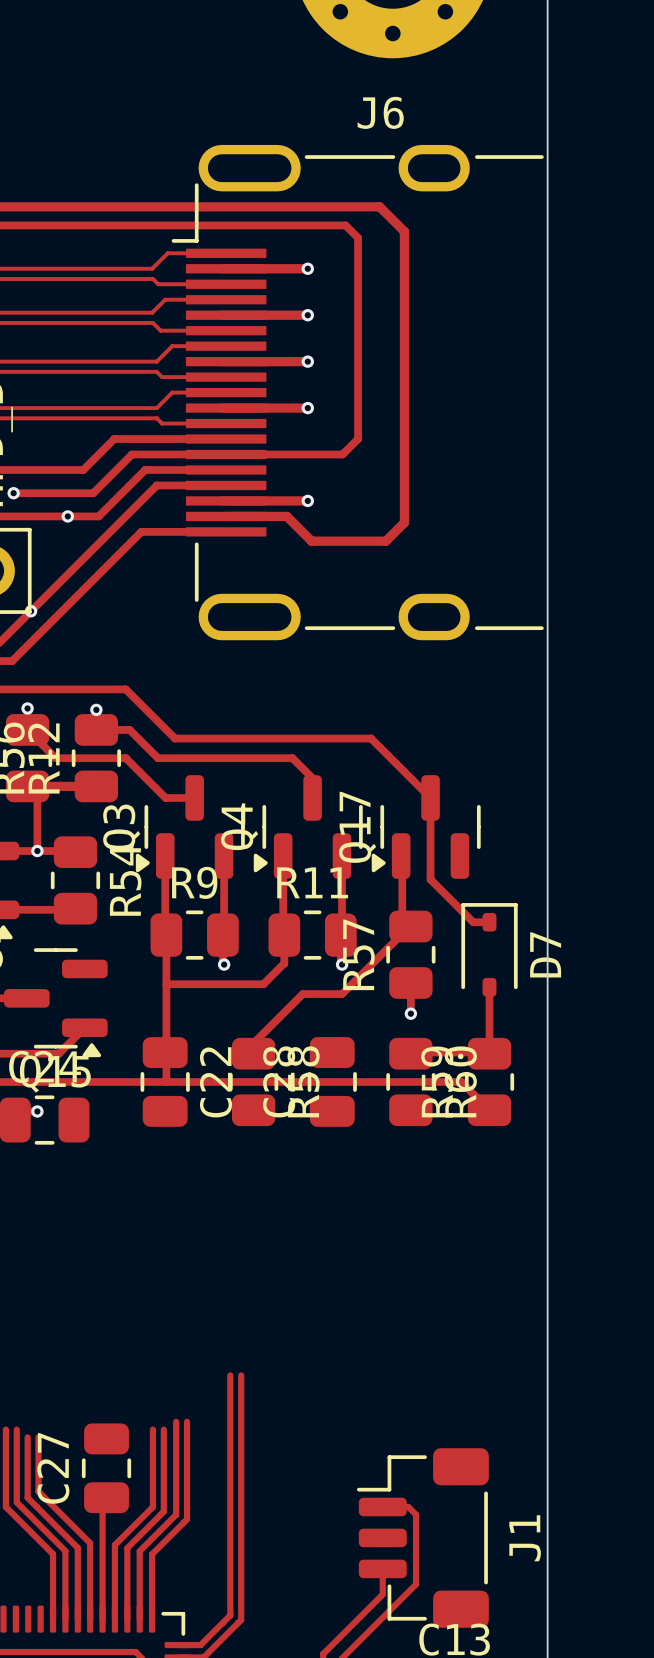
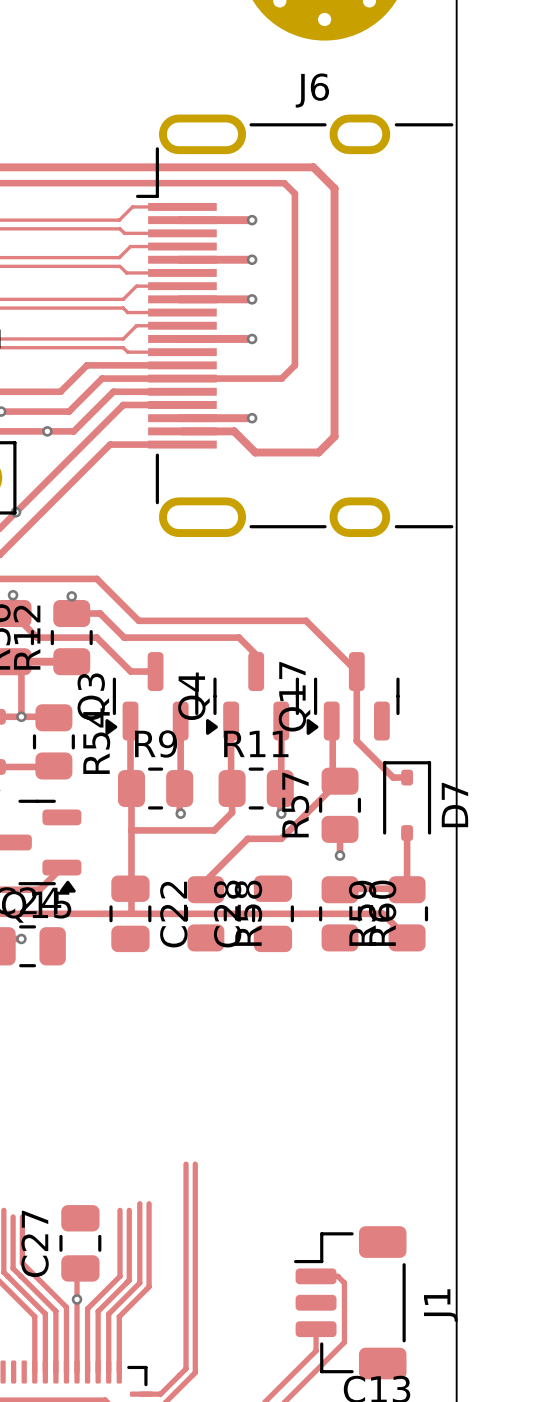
via: none -> (77, 1299)

